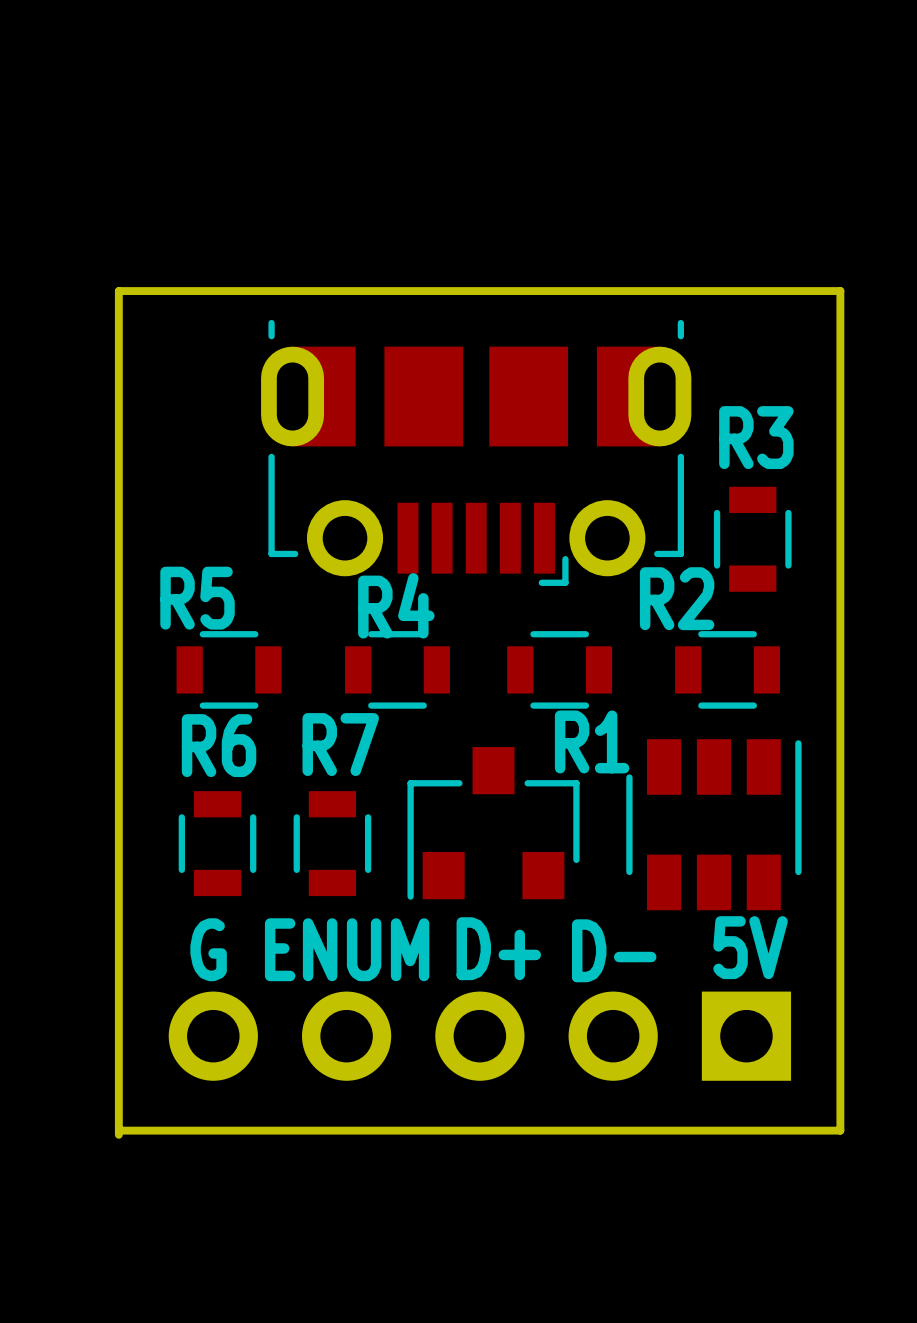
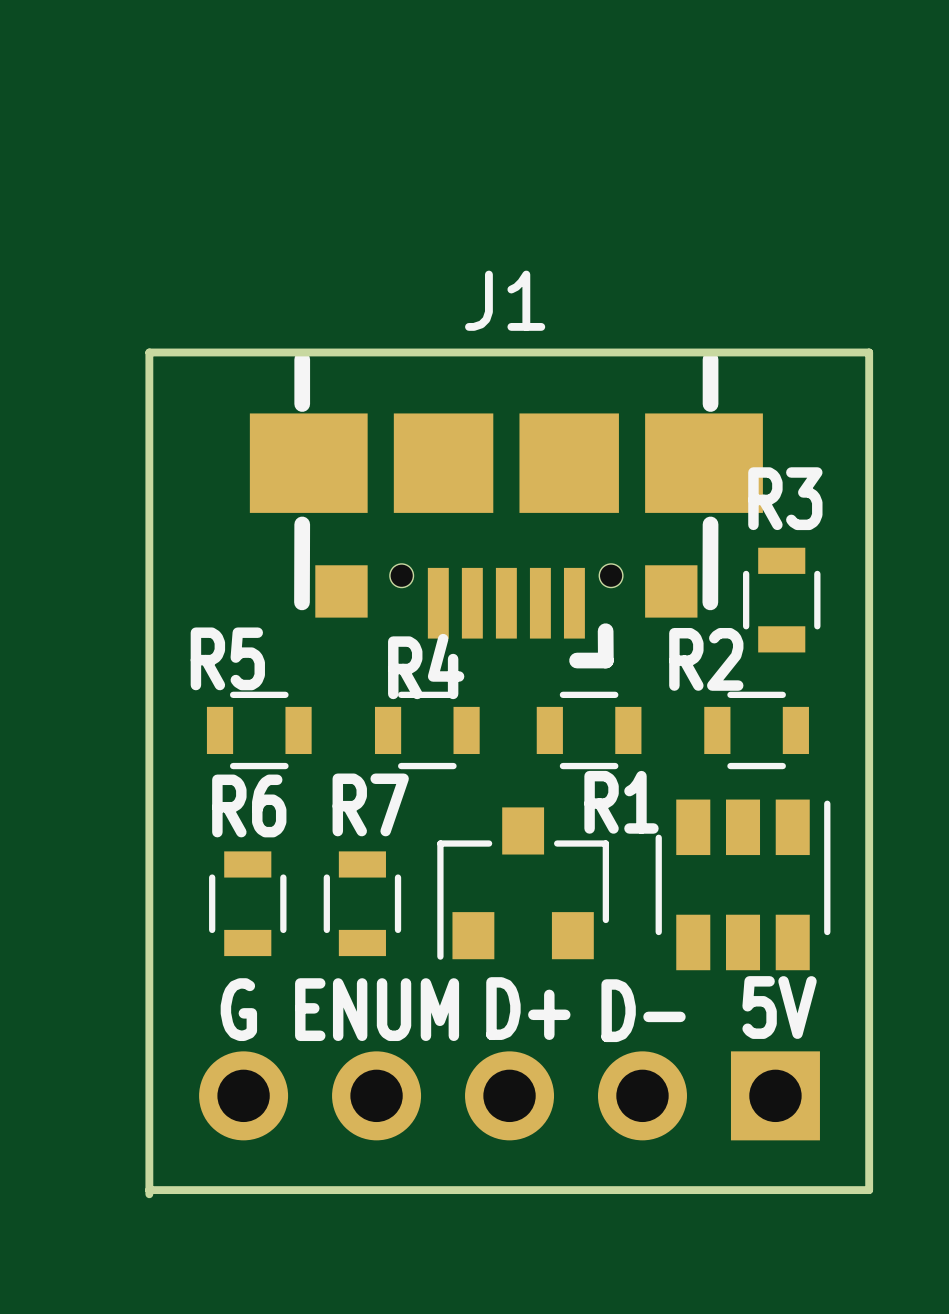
J1: none -> (506, 510)
part: (476, 452) -> none

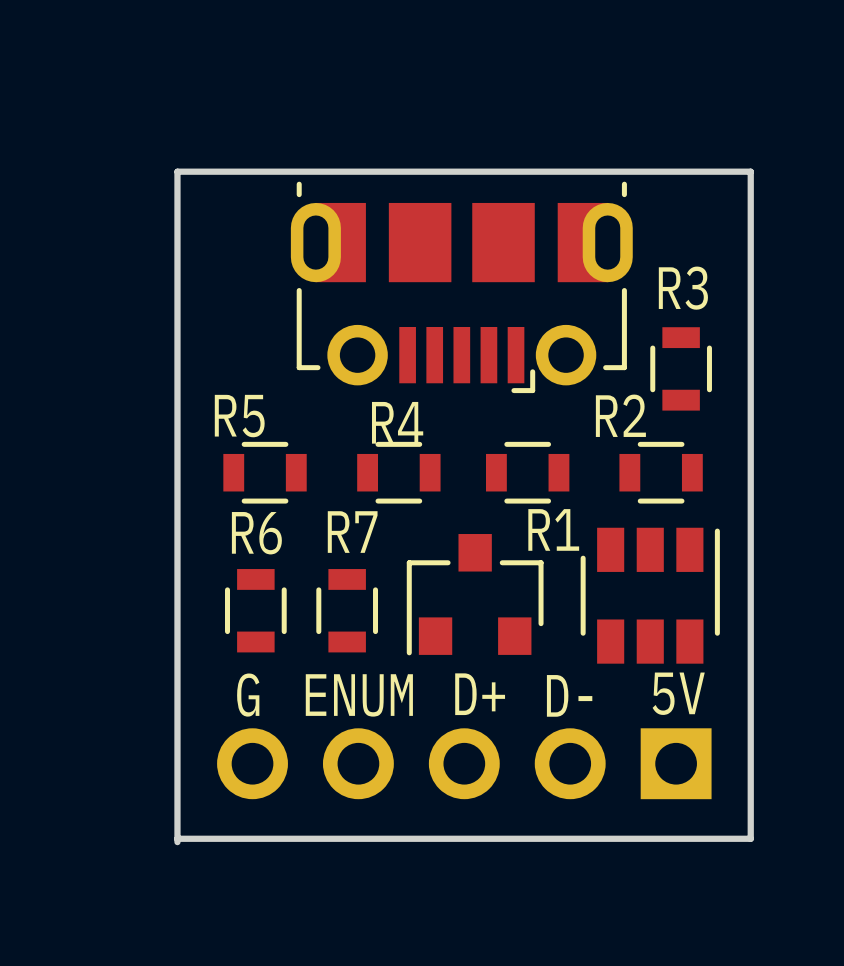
part: none -> (461, 287)
J1: (506, 510) -> none

